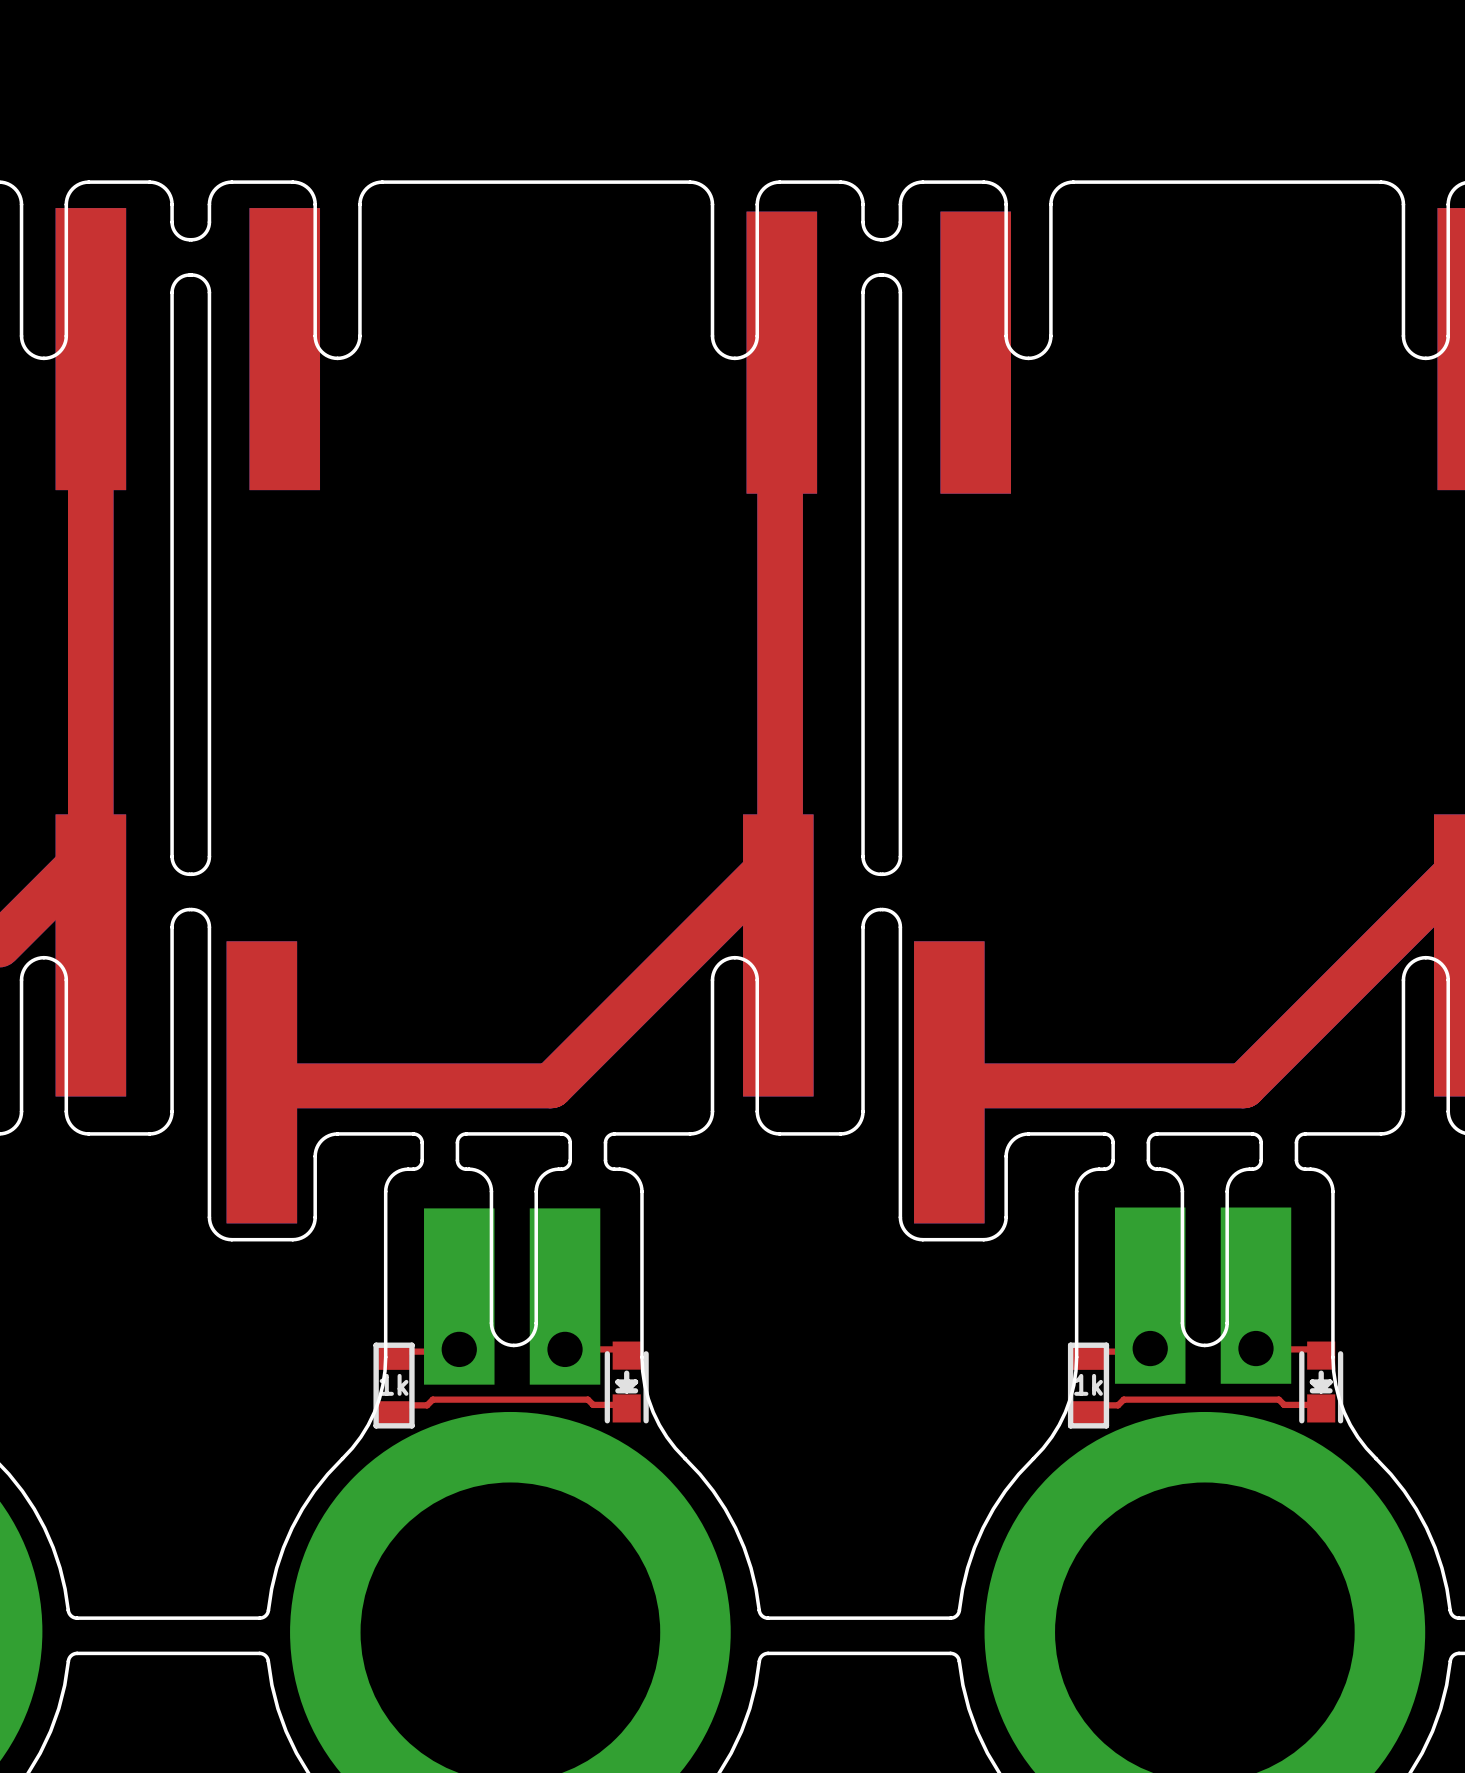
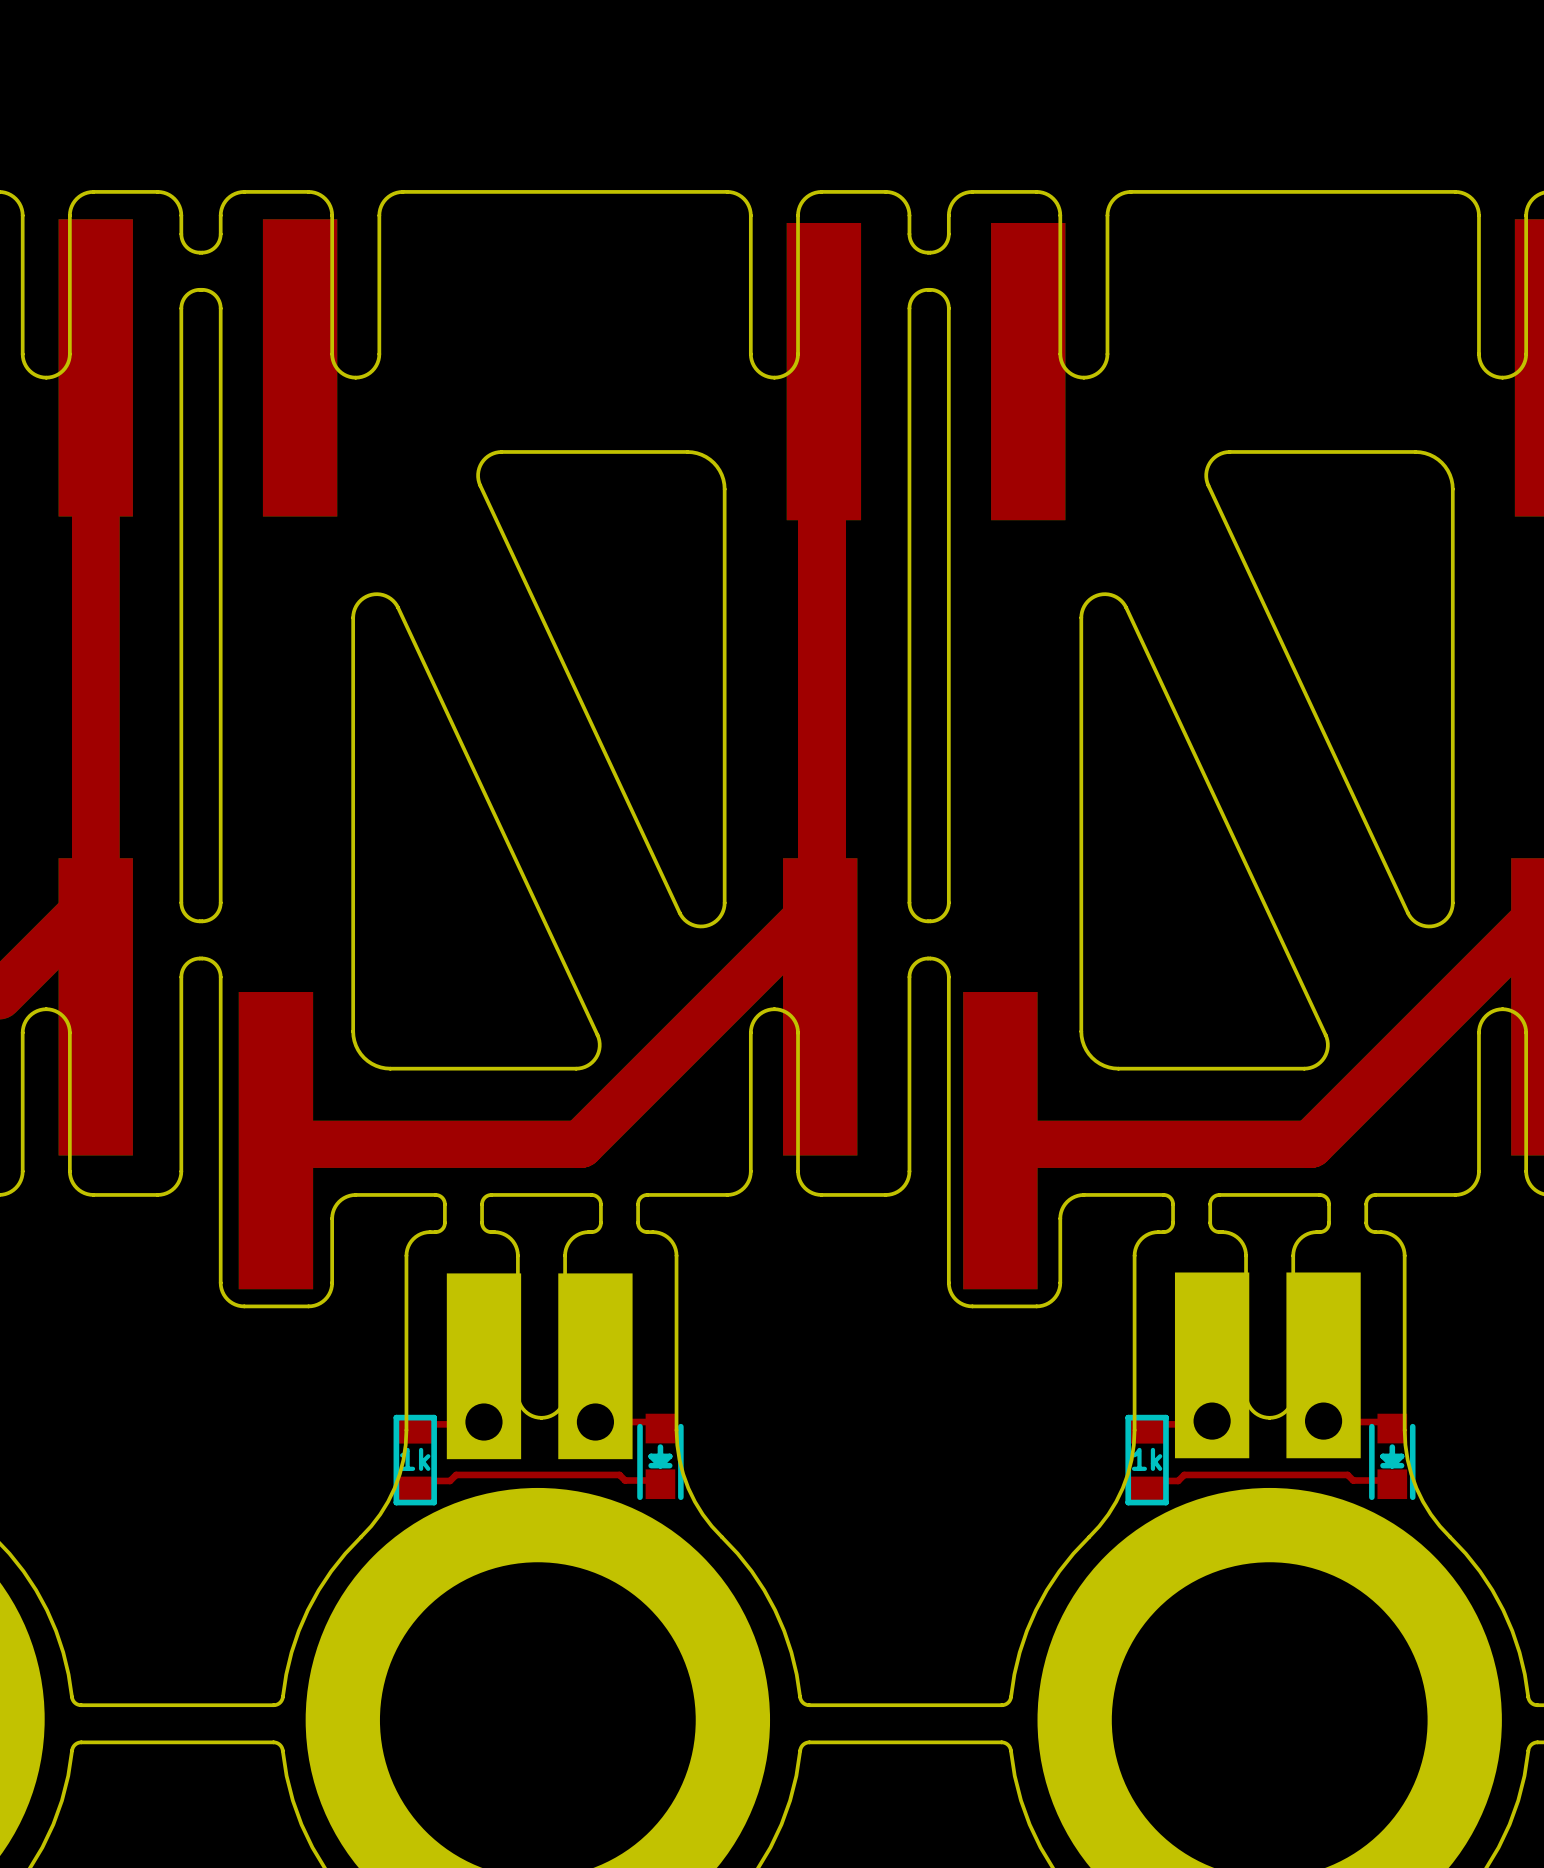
board edge: none -> (501, 451) (692, 452) (710, 459) (721, 474) (724, 489) (724, 902) (720, 916) (711, 923) (703, 926) (691, 924) (684, 919) (679, 912) (480, 485) (478, 474) (481, 462) (490, 454) (501, 451)
board edge: none -> (1229, 451) (1420, 452) (1438, 459) (1449, 474) (1452, 489) (1452, 902) (1448, 916) (1439, 923) (1431, 926) (1420, 924) (1412, 919) (1407, 912) (1208, 485) (1206, 474) (1209, 462) (1218, 454) (1229, 451)
board edge: none -> (398, 607) (597, 1035) (599, 1046) (597, 1055) (592, 1062) (584, 1067) (576, 1068) (385, 1068) (367, 1060) (355, 1045) (353, 1031) (353, 614) (359, 601) (371, 594) (385, 595) (393, 600) (398, 607)
board edge: none -> (1126, 607) (1325, 1035) (1327, 1046) (1325, 1055) (1320, 1062) (1312, 1067) (1304, 1068) (1113, 1068) (1095, 1060) (1084, 1045) (1081, 1031) (1081, 614) (1087, 601) (1099, 594) (1108, 594) (1116, 597) (1126, 607)

